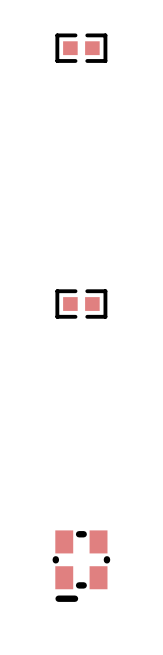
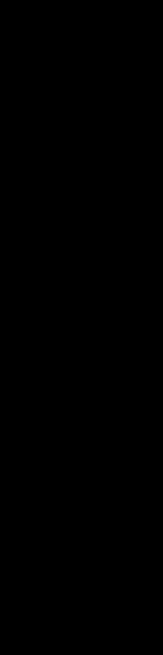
part: (81, 48) -> none
part: (81, 304) -> none
part: (81, 566) -> none

